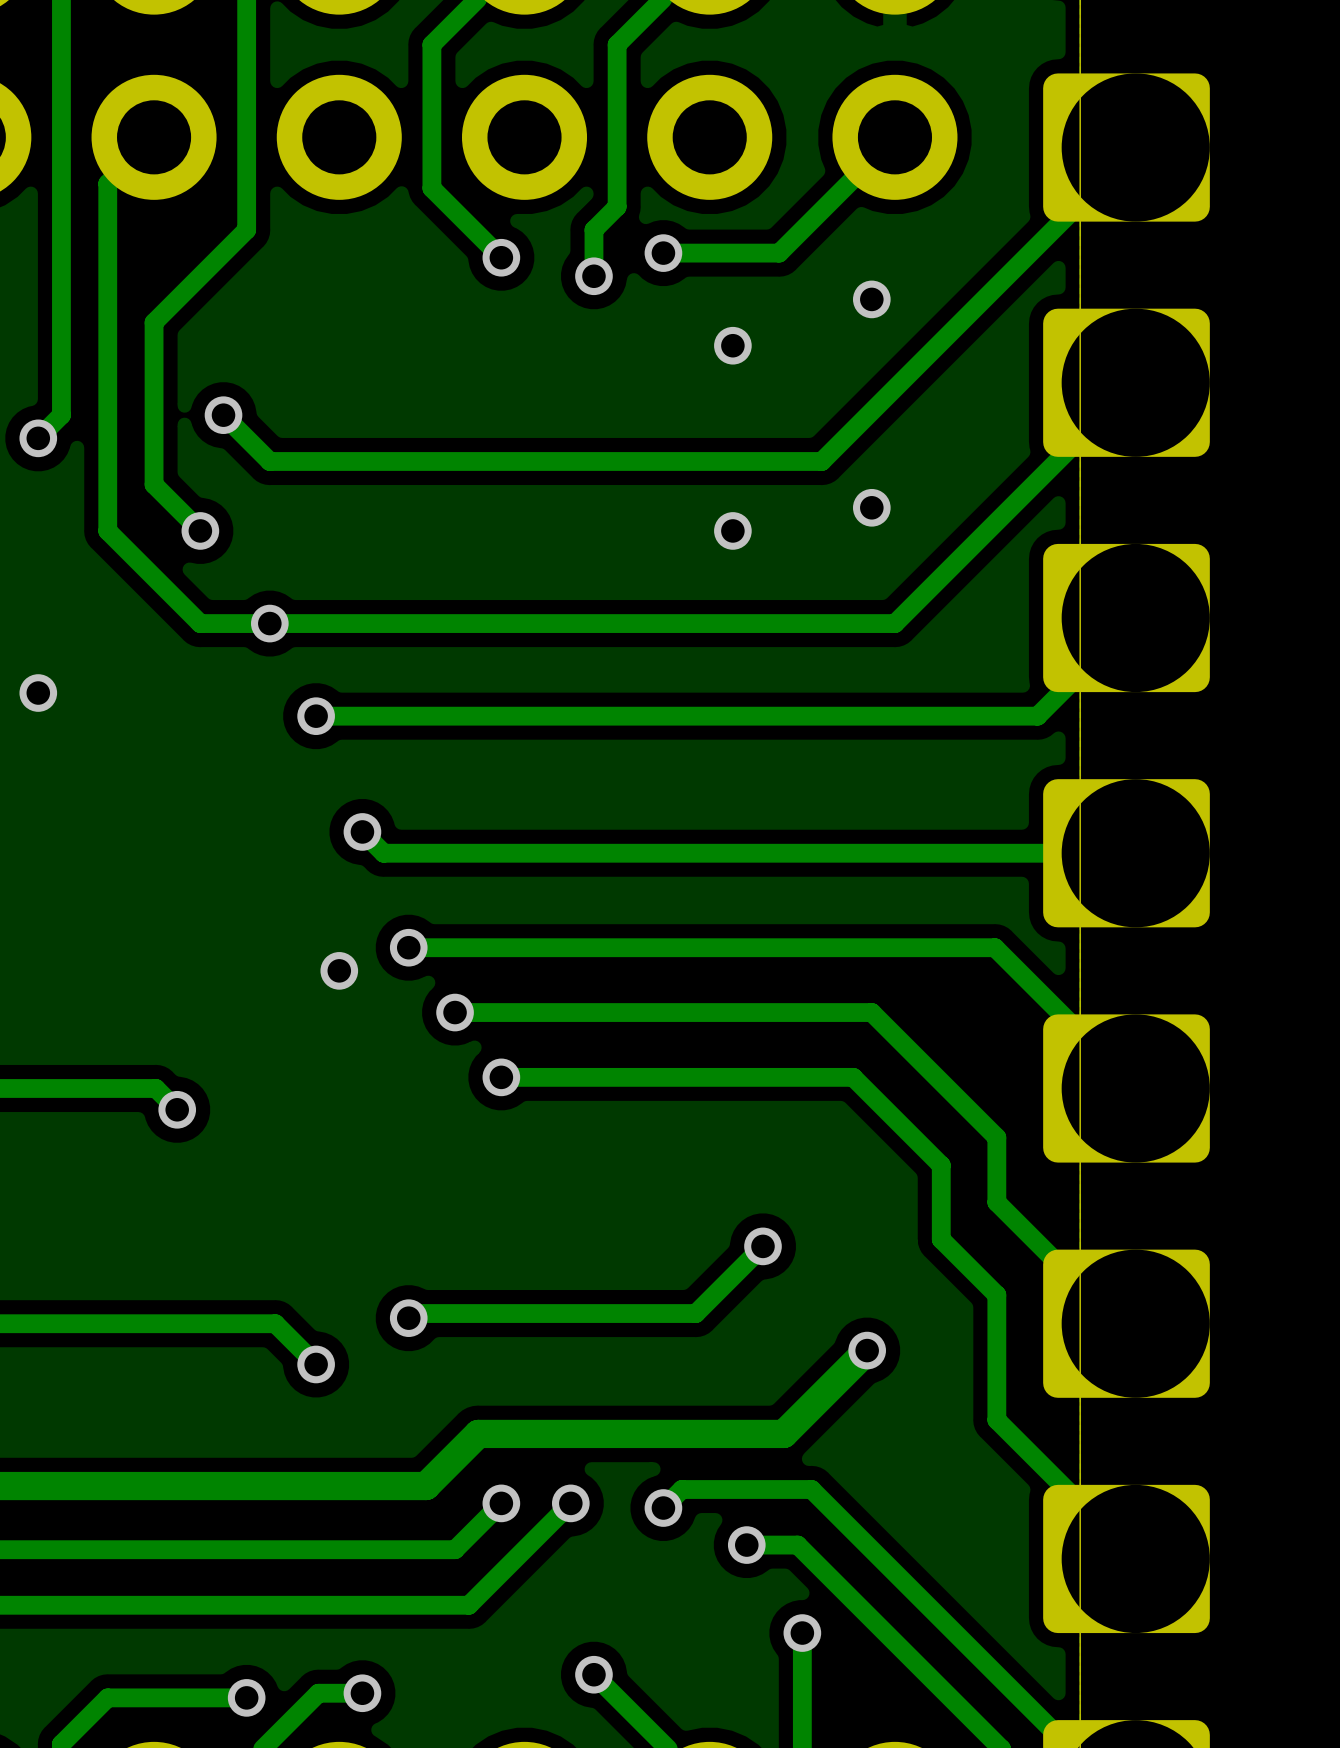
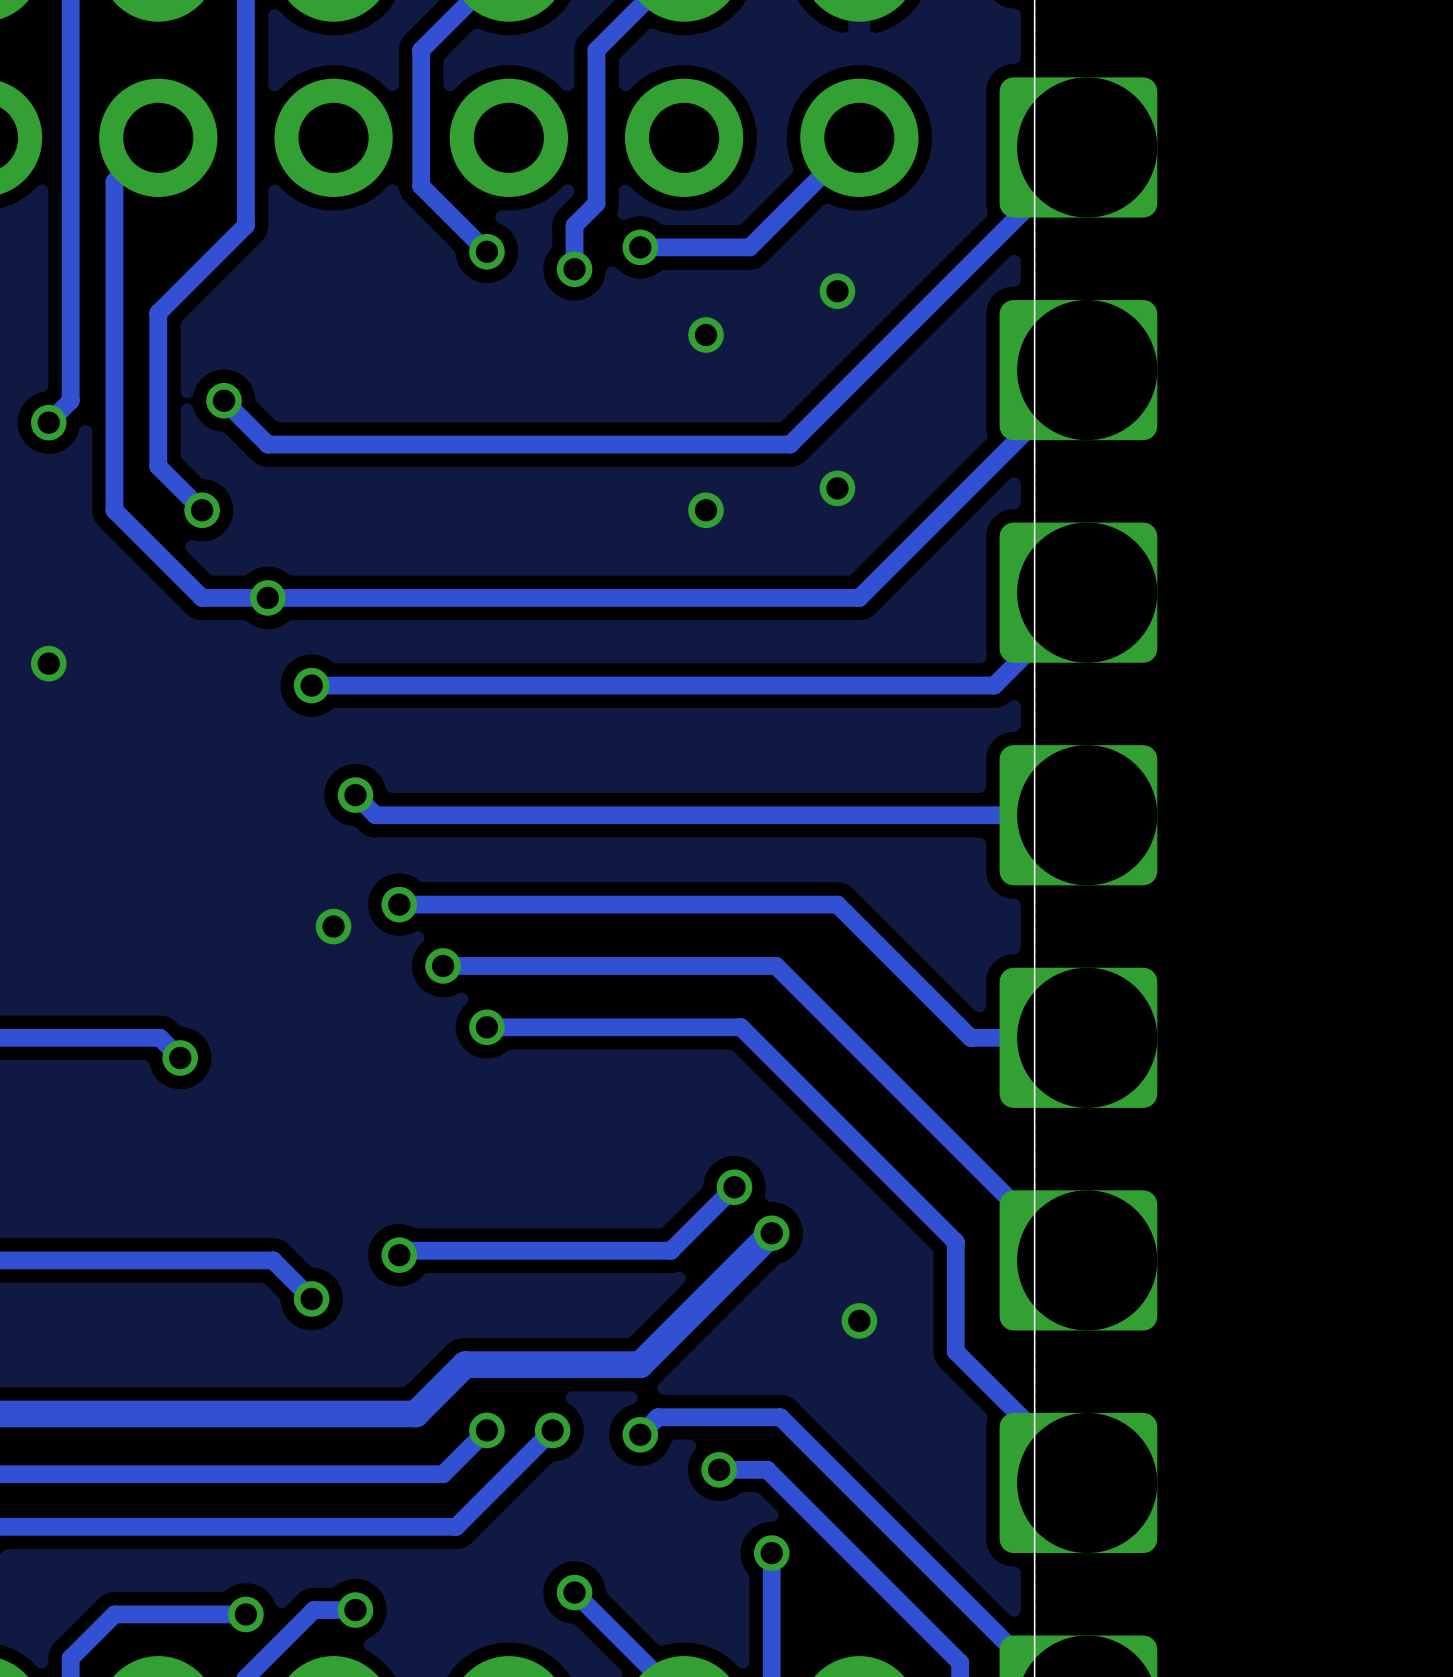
track: (871, 947) (994, 947) (1135, 1088) -> (837, 904) (970, 1037) (1087, 1037)
track: (806, 1012) (871, 1012) (996, 1137) (996, 1202) -> (776, 965) (955, 1145)
track: (769, 1077) (853, 1077) (941, 1165) (941, 1239) (996, 1295) (996, 1304) -> (741, 1027) (955, 1242)
via: none -> (771, 1233)
track: (867, 1350) (783, 1433) (663, 1433) -> (771, 1233) (640, 1364)
via position: (867, 1350) -> (859, 1320)

